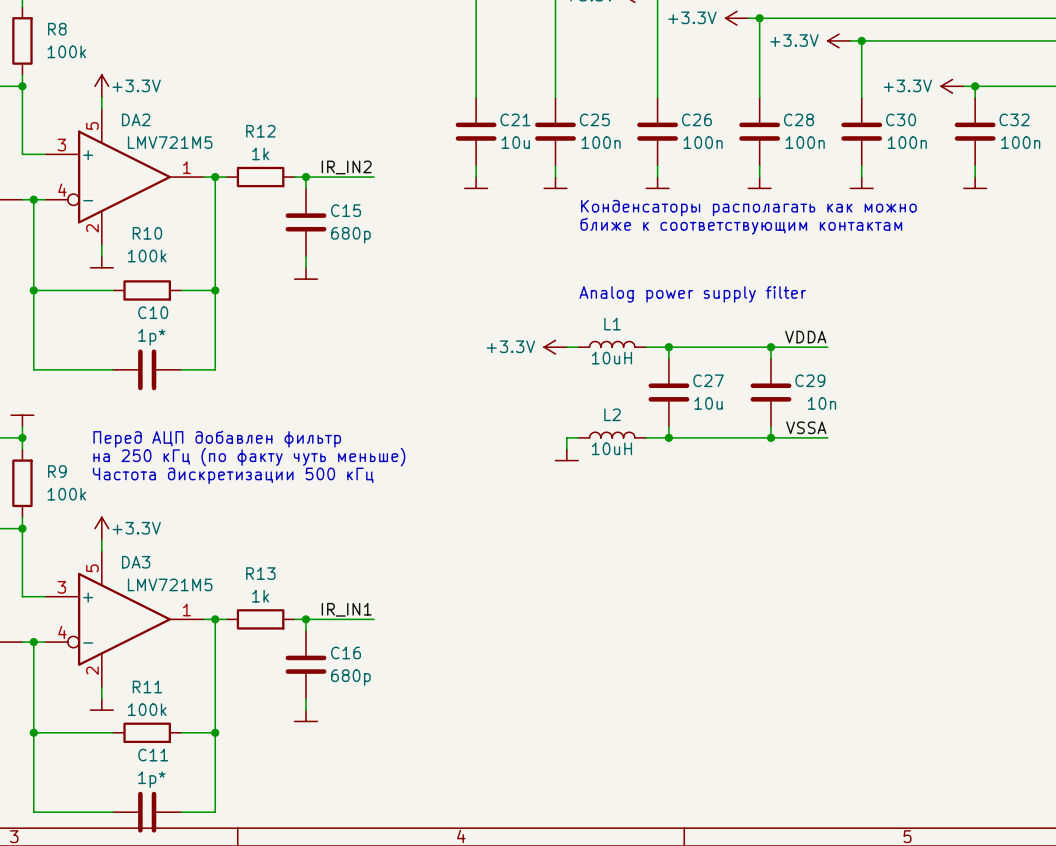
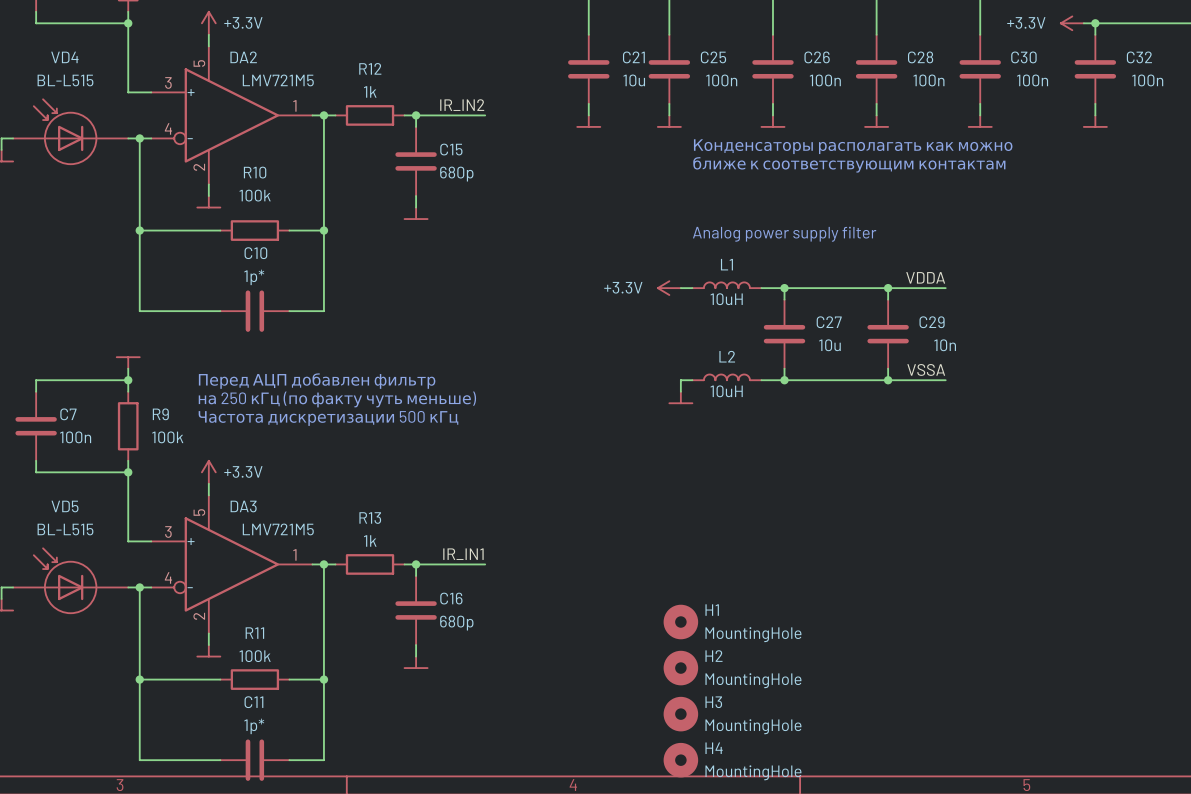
H1: none -> MountingHole (680, 622)
H2: none -> MountingHole (680, 668)
H3: none -> MountingHole (680, 714)
H4: none -> MountingHole (680, 760)

